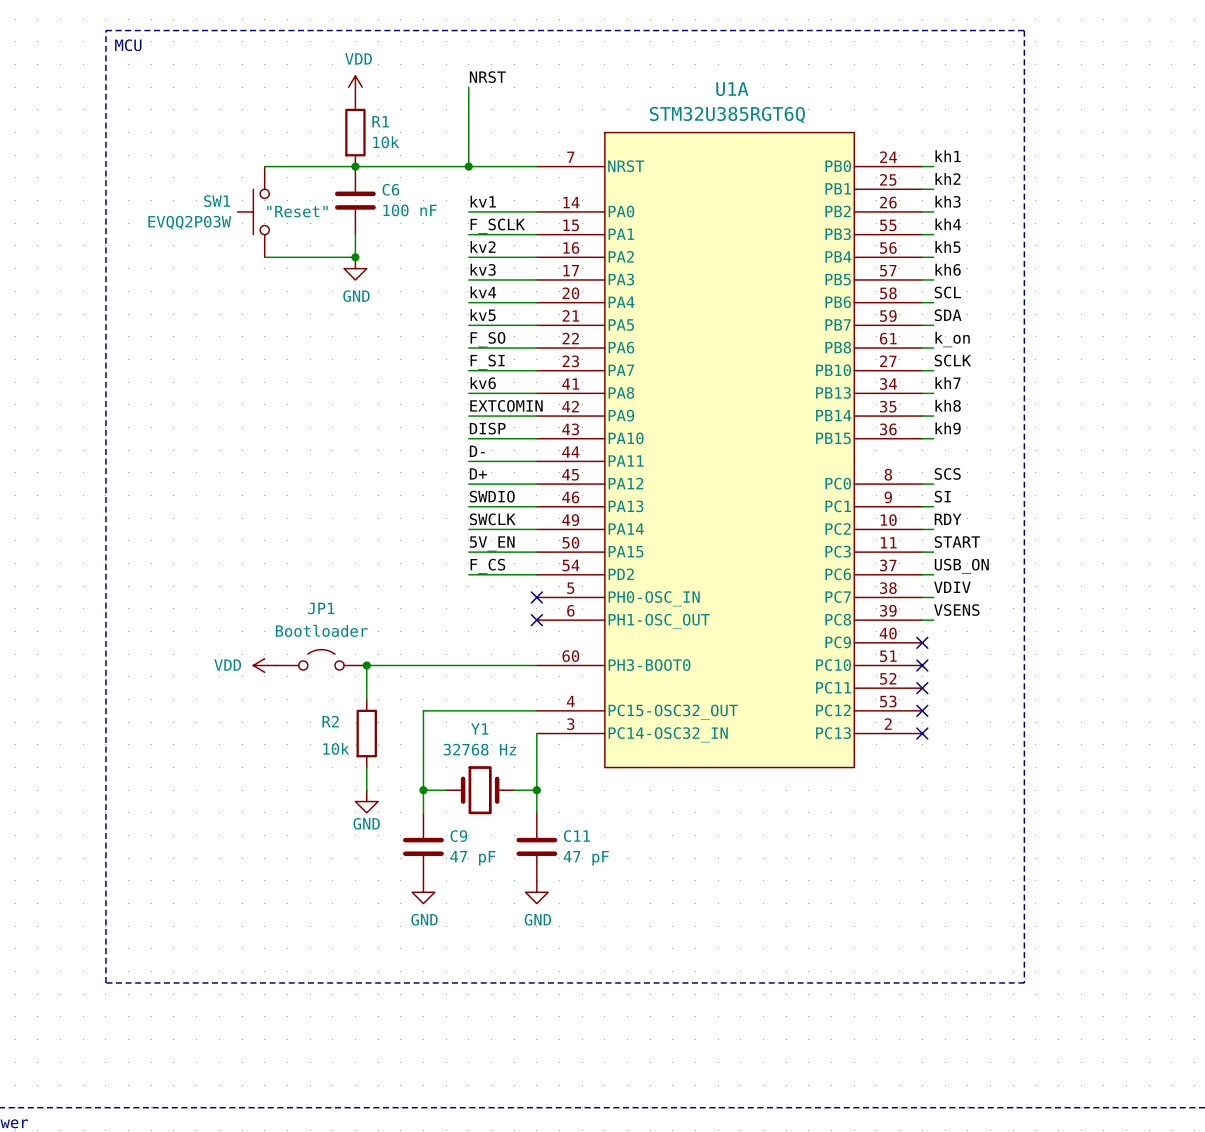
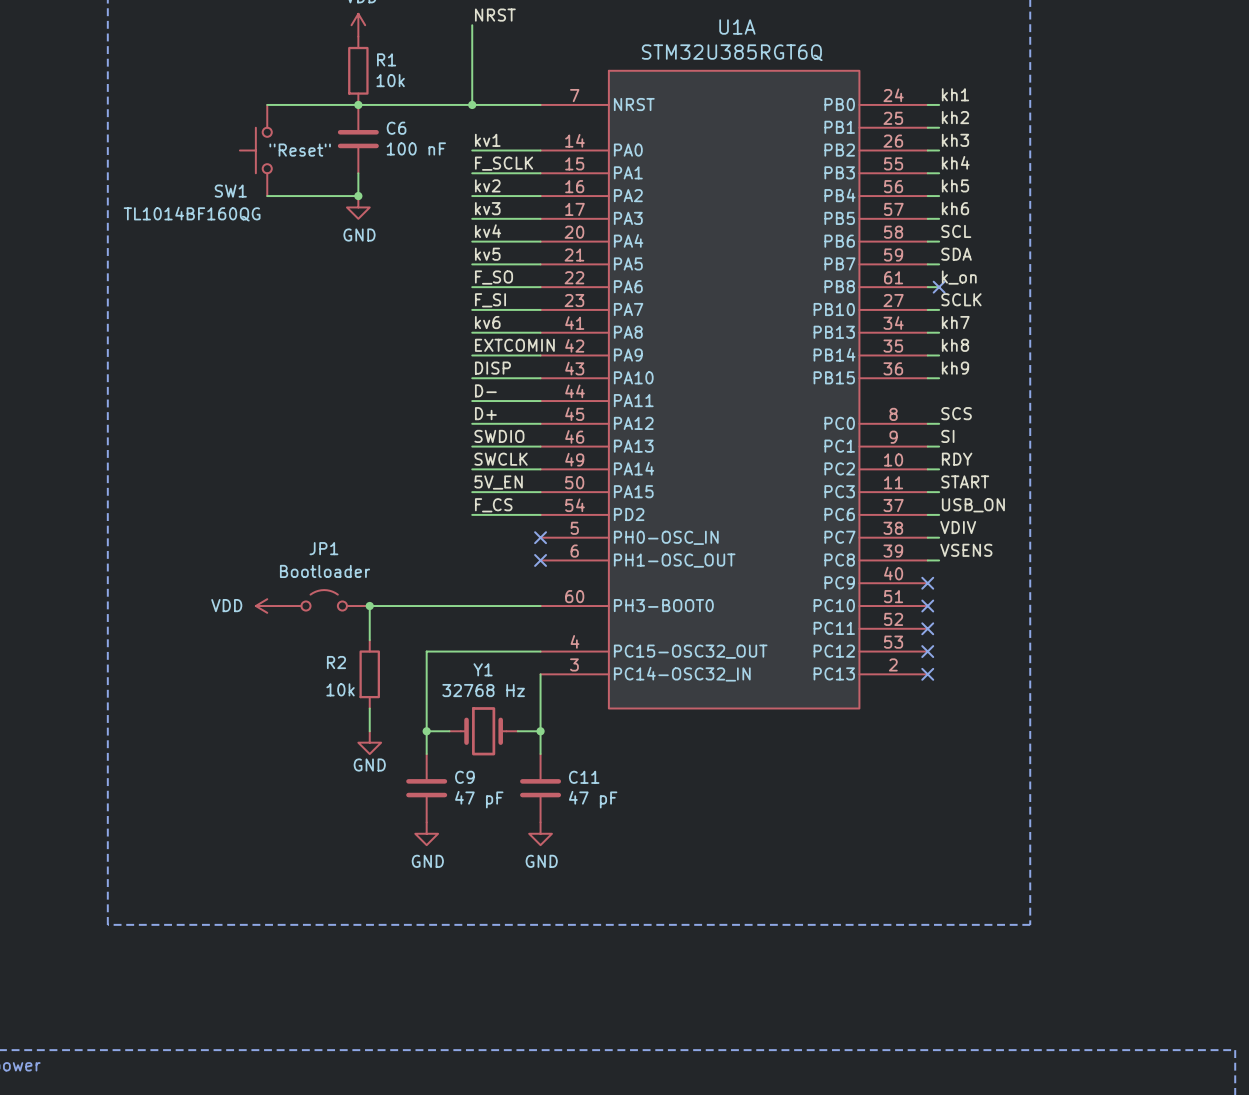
SW1 name position: SW1 (217, 201) -> SW1 (230, 191)
SW1 value: EVQQ2P03W (189, 222) -> TL1014BF160QG (192, 214)
no-connect mark: none -> (939, 287)

